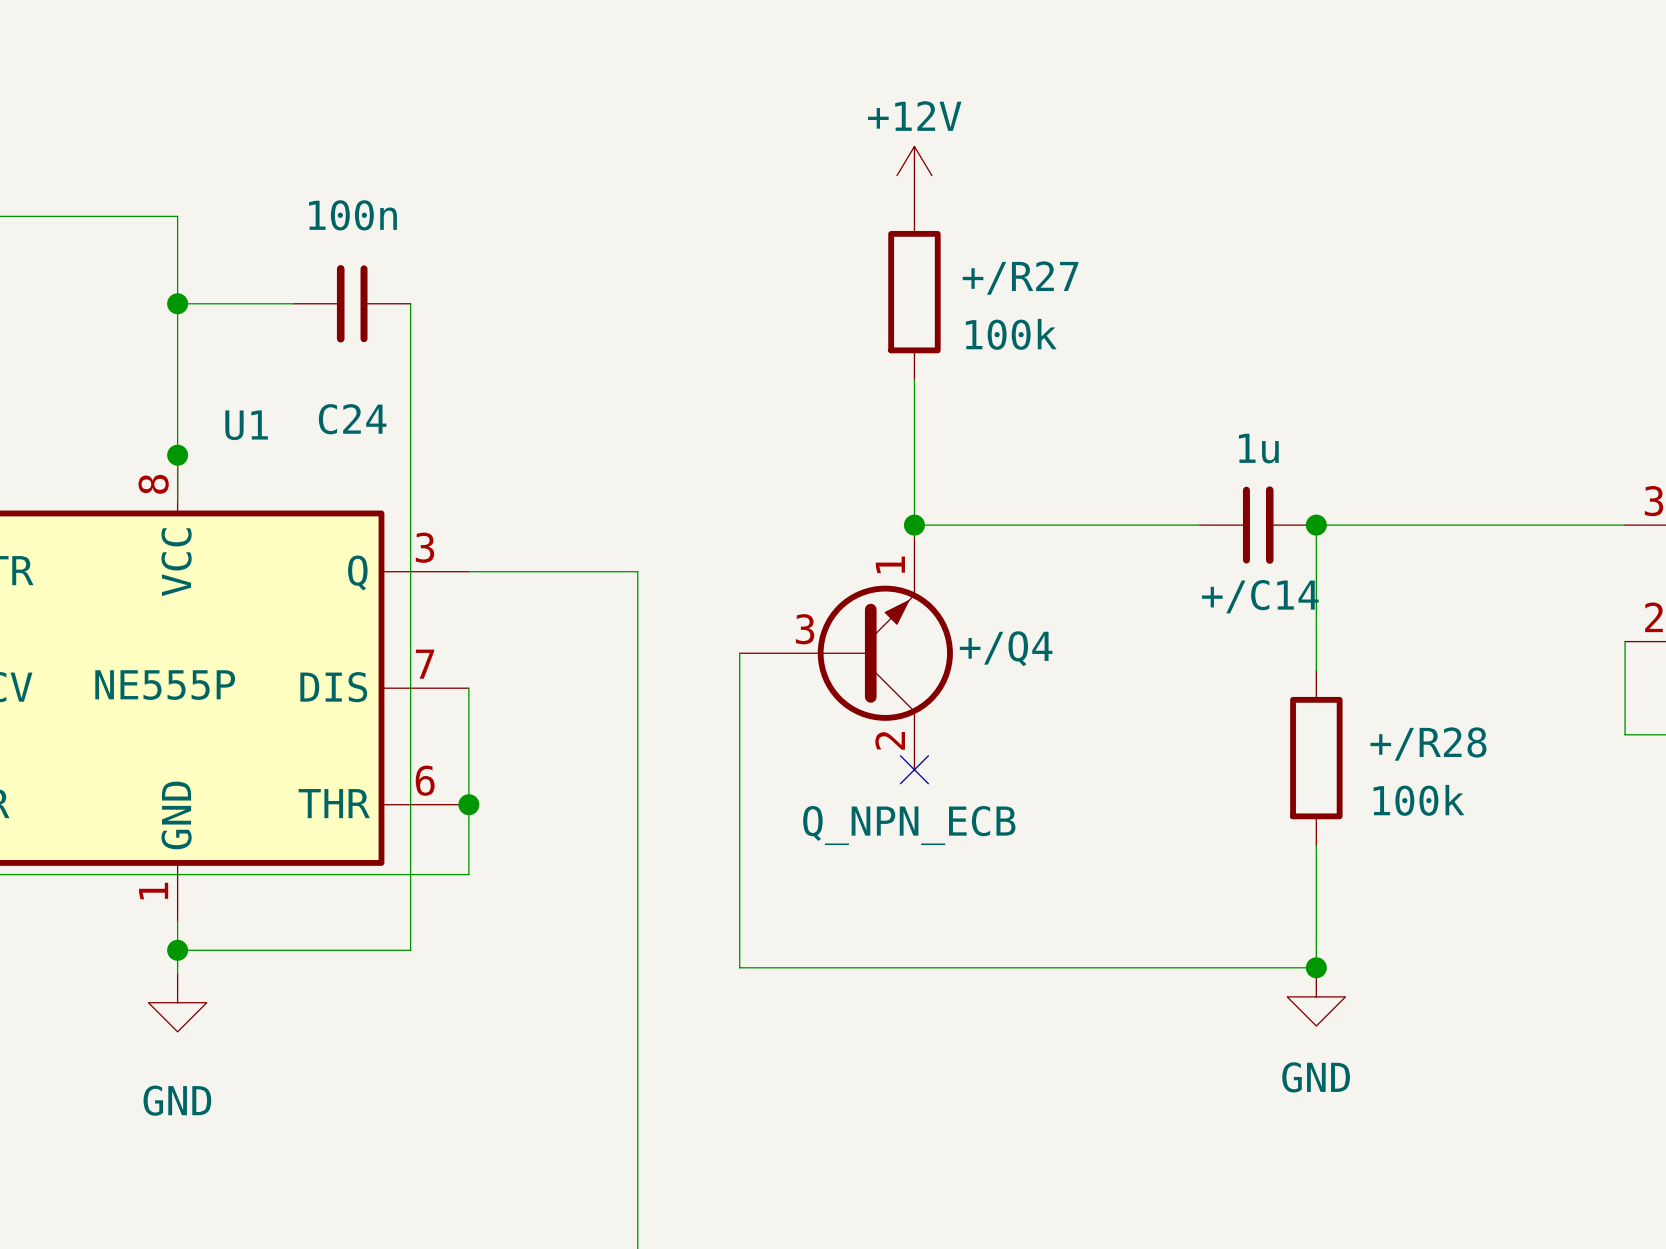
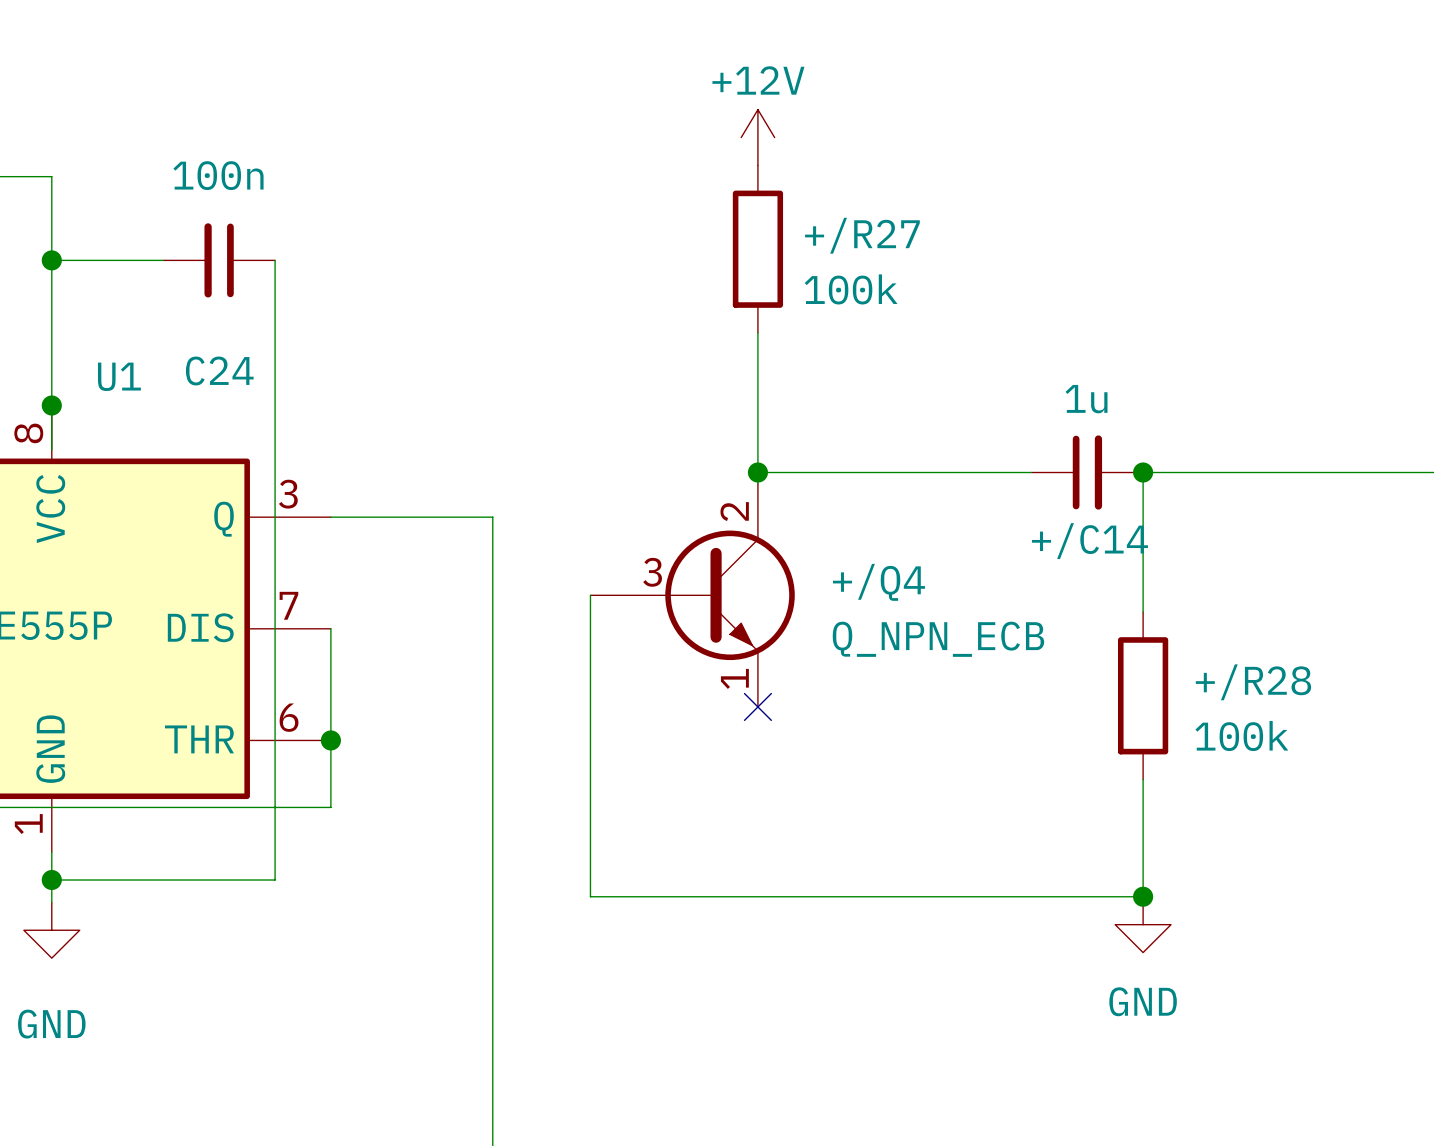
+/Q4 flip: as is (885, 653) -> up-down (730, 595)
+/Q4 value position: Q_NPN_ECB (909, 825) -> Q_NPN_ECB (938, 639)

